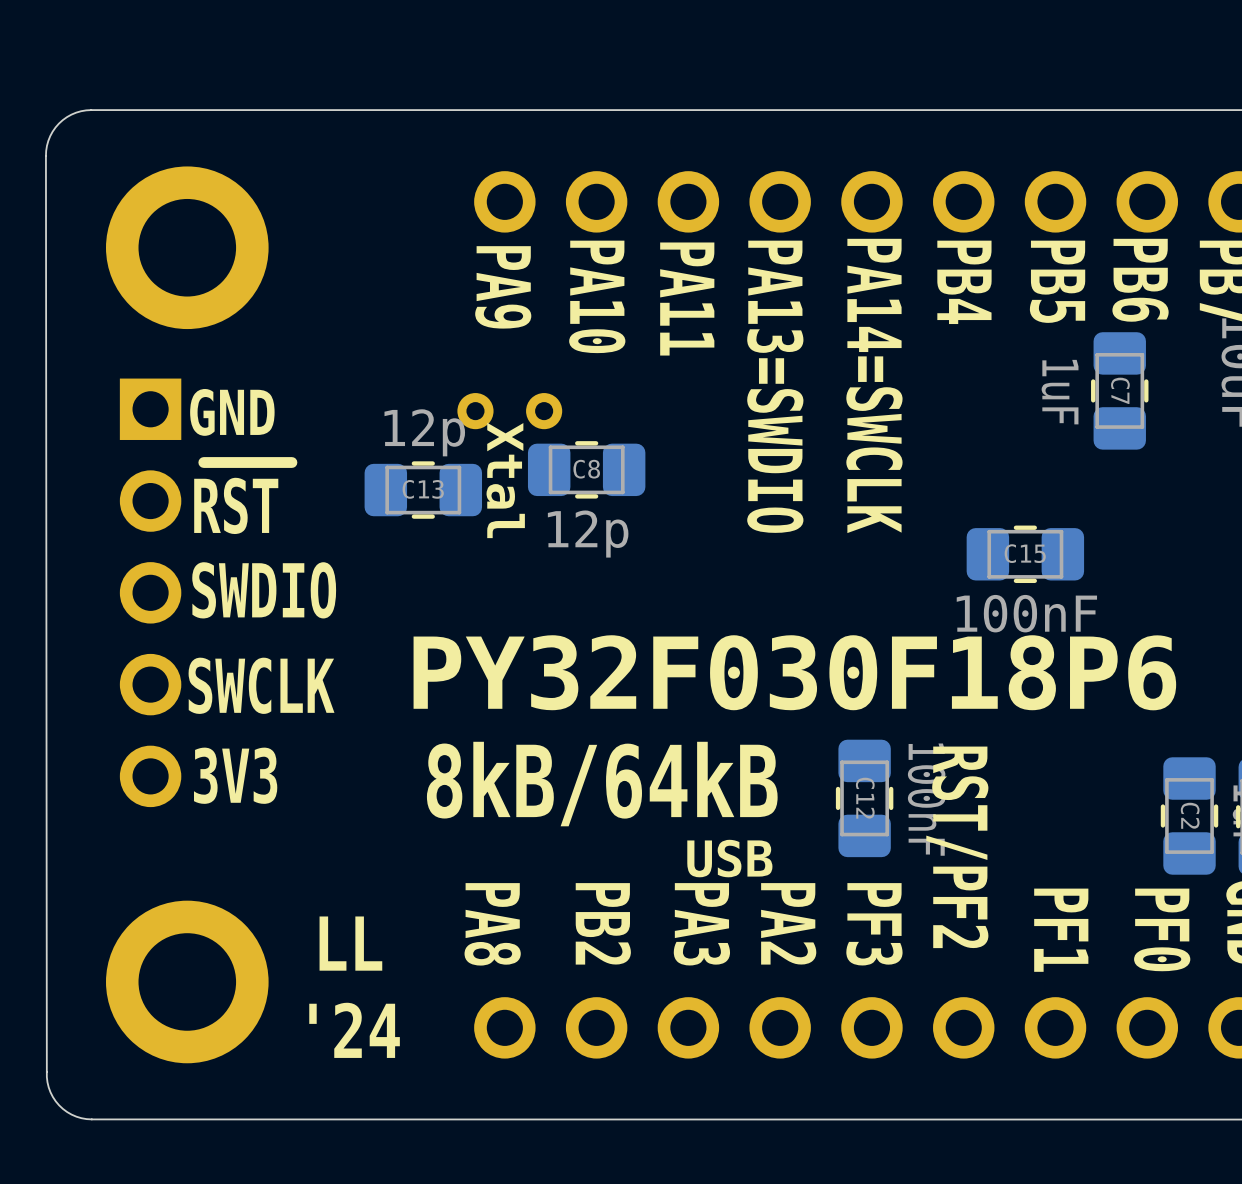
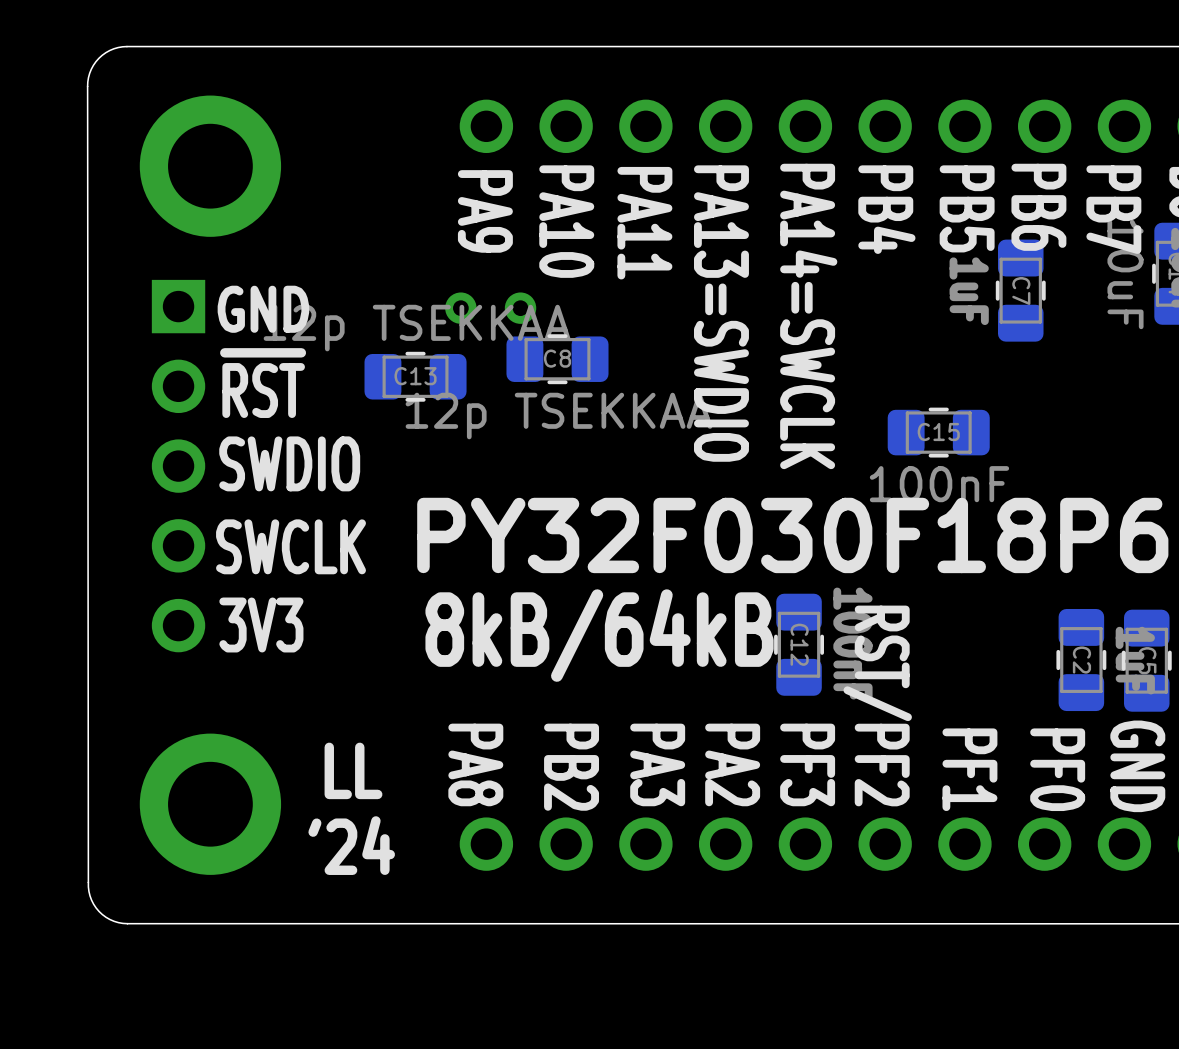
C13 value: 12p (424, 432) -> 12p TSEKKAA (417, 328)
text: Xtal (505, 480) -> none
C8 value: 12p (588, 534) -> 12p TSEKKAA (558, 416)
text: USB (729, 858) -> none

